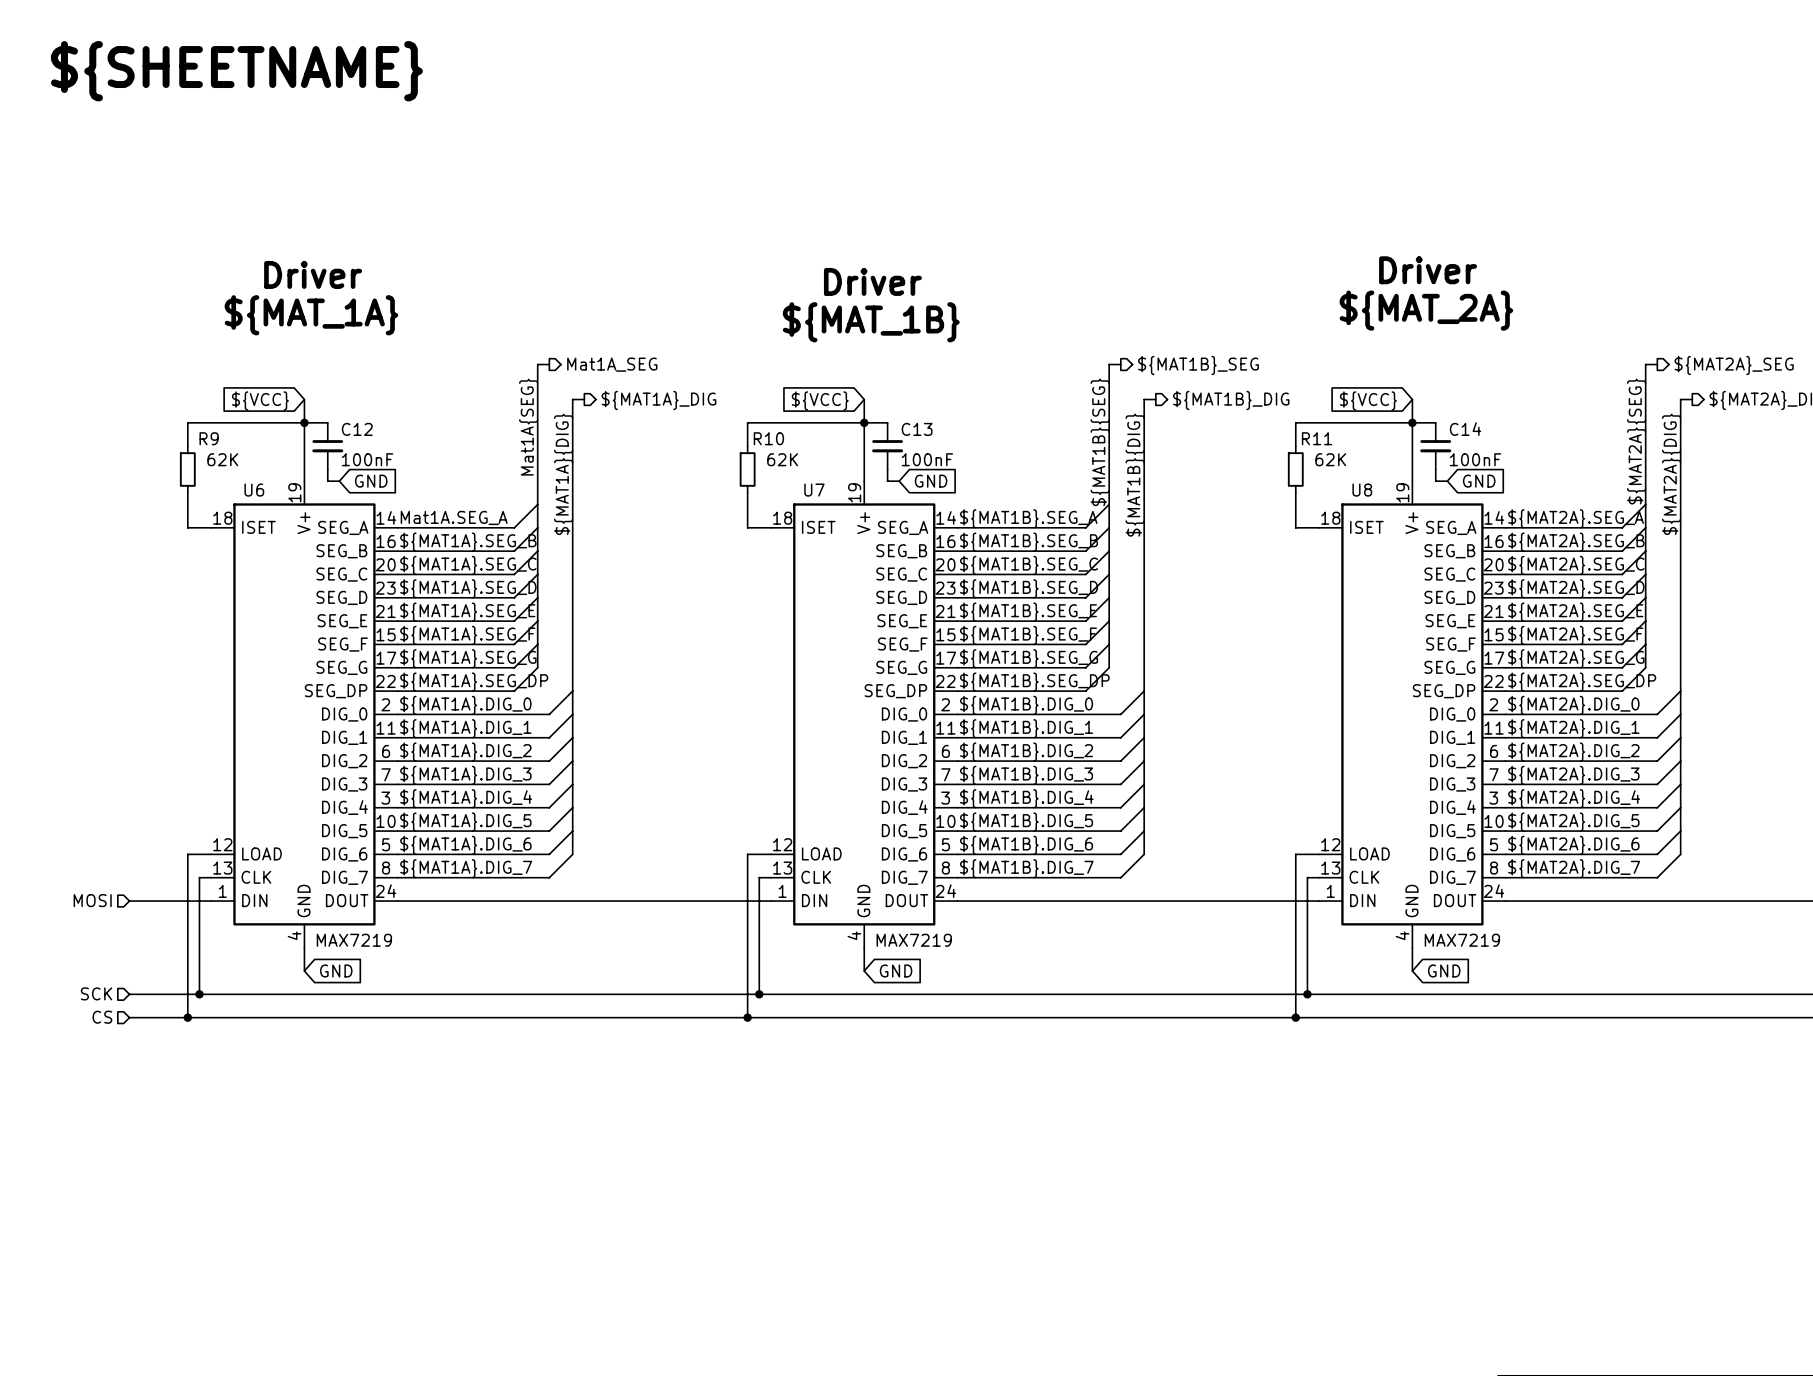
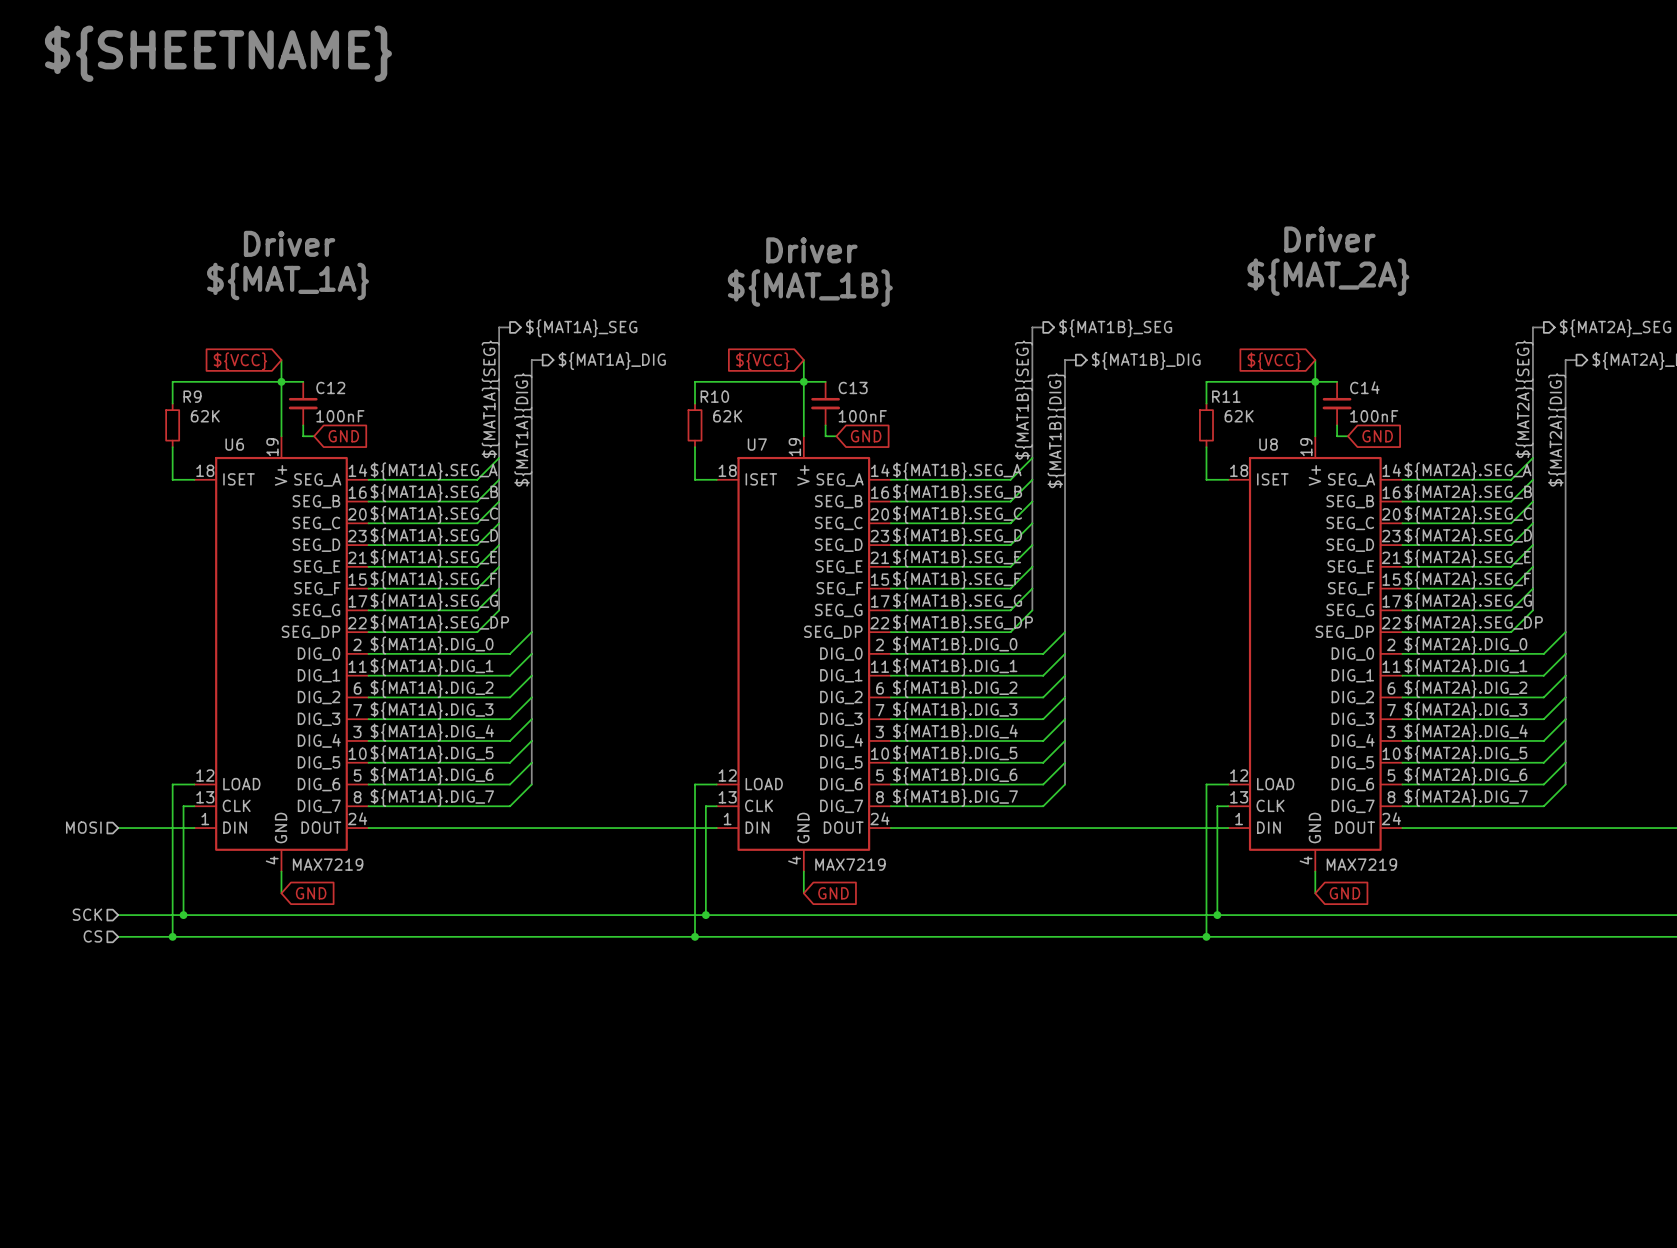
hierarchical label: Mat1A_SEG (612, 364) -> ${MAT1A}_SEG (581, 328)
label: Mat1A{SEG} (528, 427) -> ${MAT1A}{SEG} (490, 399)
label: Mat1A.SEG_A (454, 517) -> ${MAT1A}.SEG_A (434, 471)

